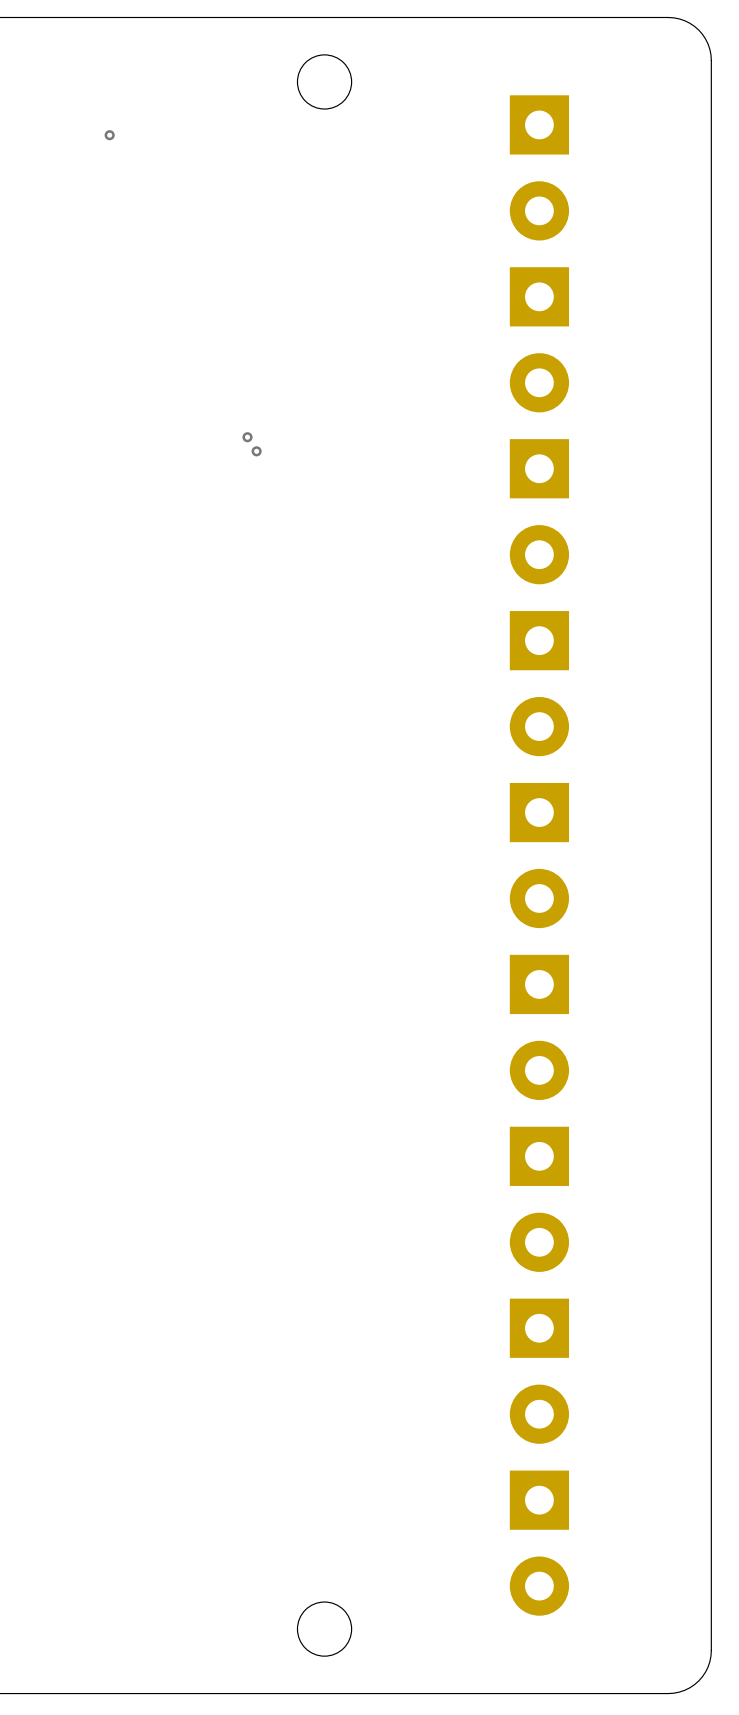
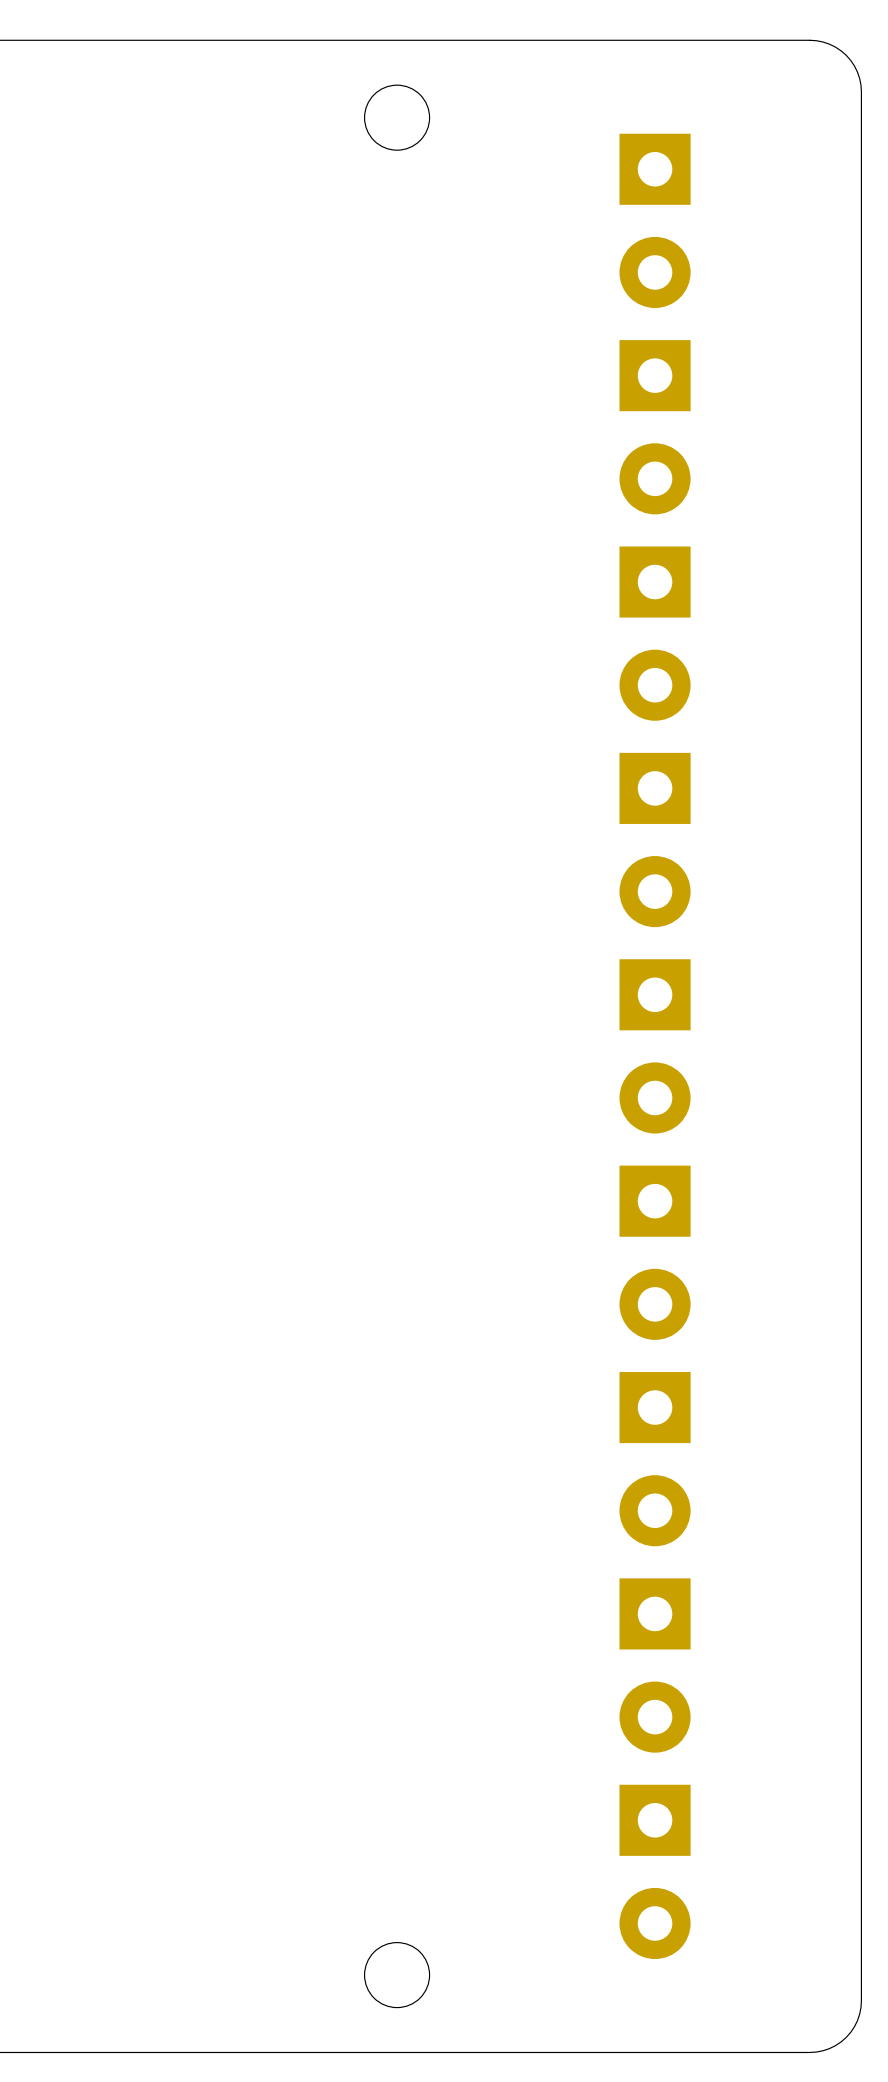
via: (109, 135) -> none
via: (247, 437) -> none
via: (256, 451) -> none

